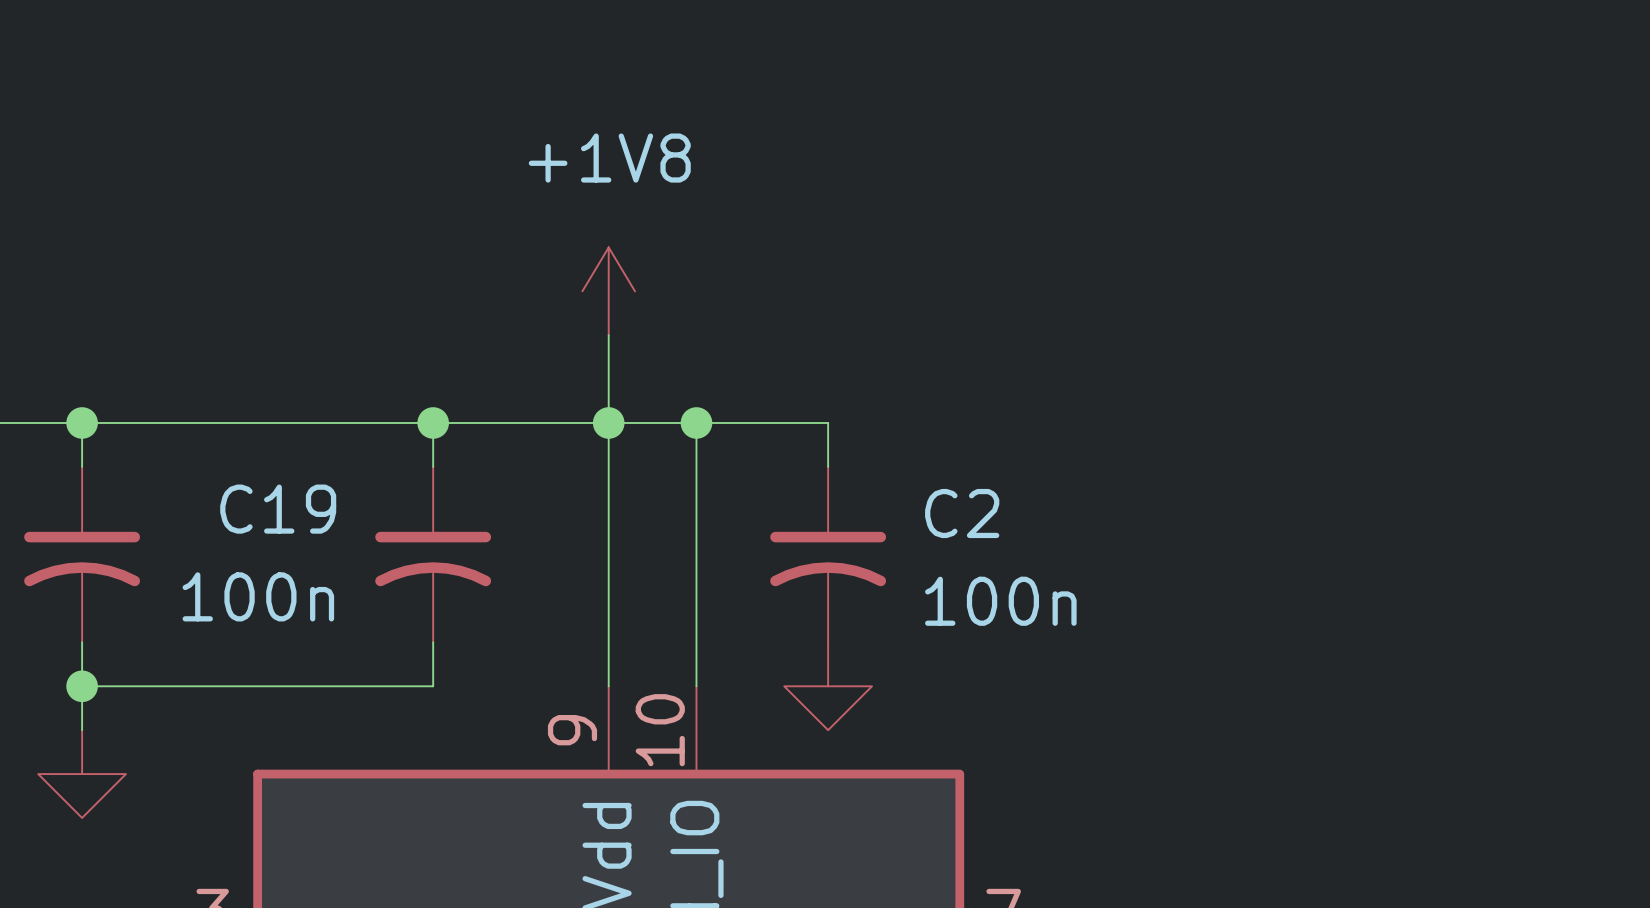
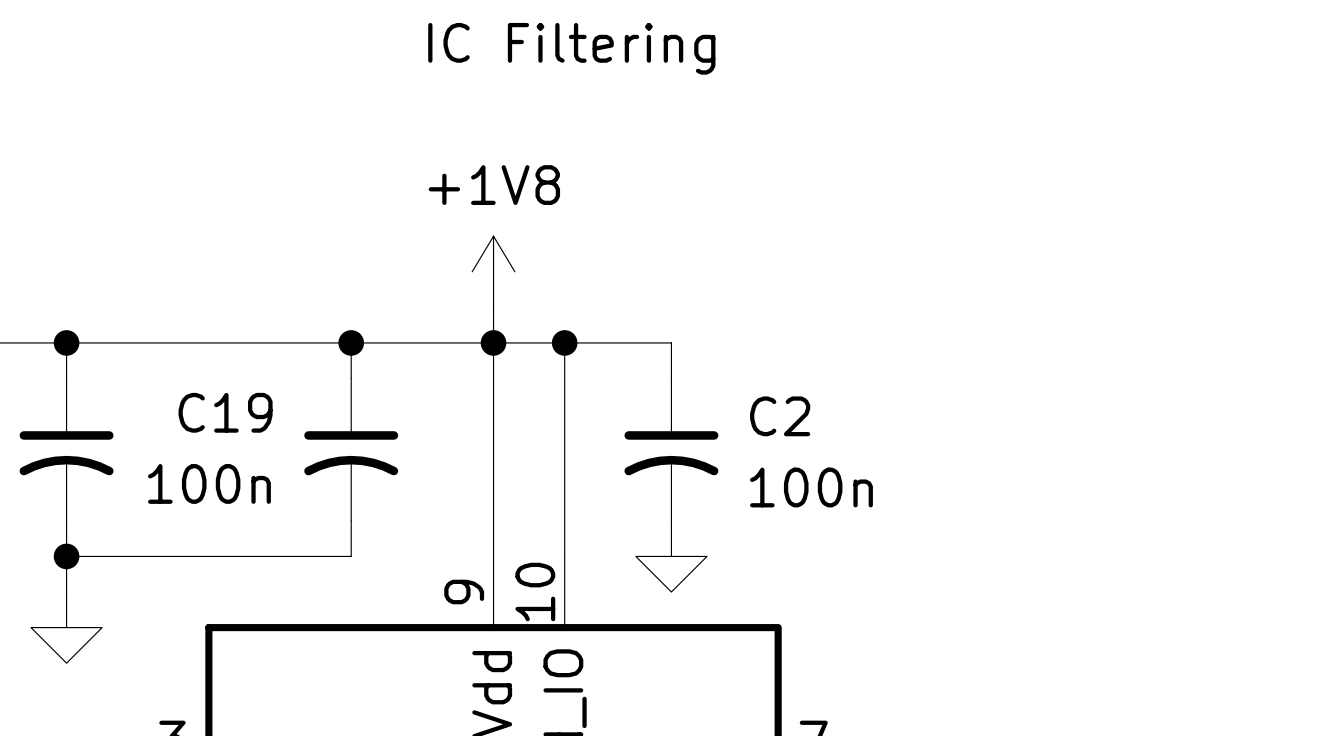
text: none -> IC Filtering (571, 48)
power symbol text position: +1V8 (609, 158) -> +1V8 (494, 185)
power symbol position: +1V8 (608, 291) -> +1V8 (493, 271)

